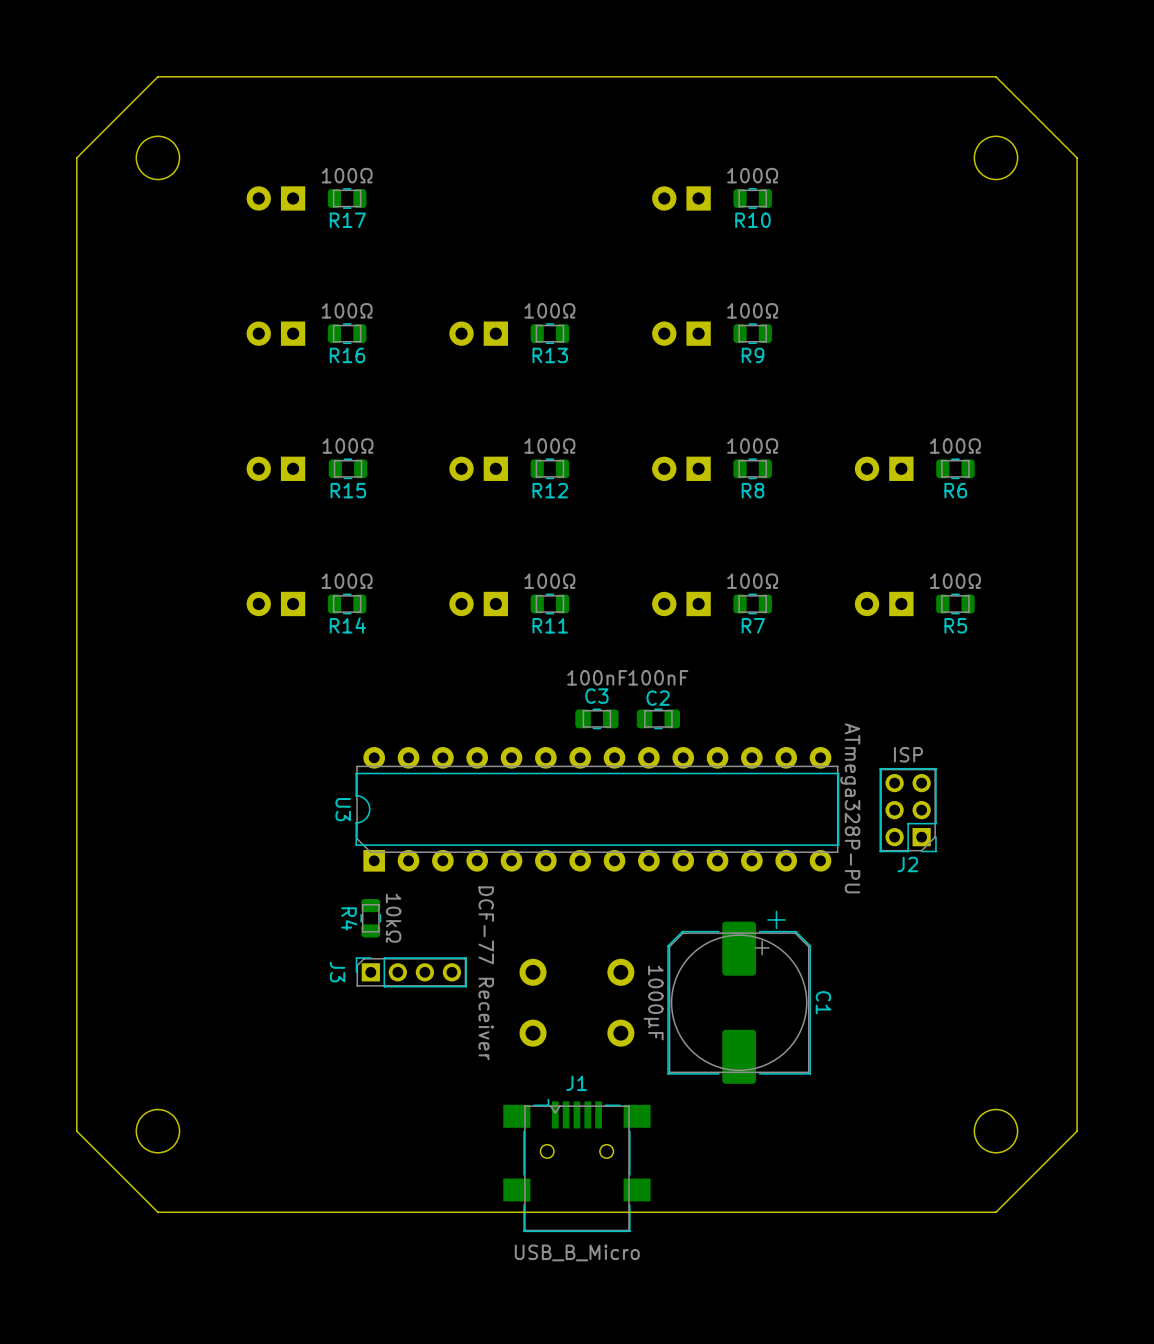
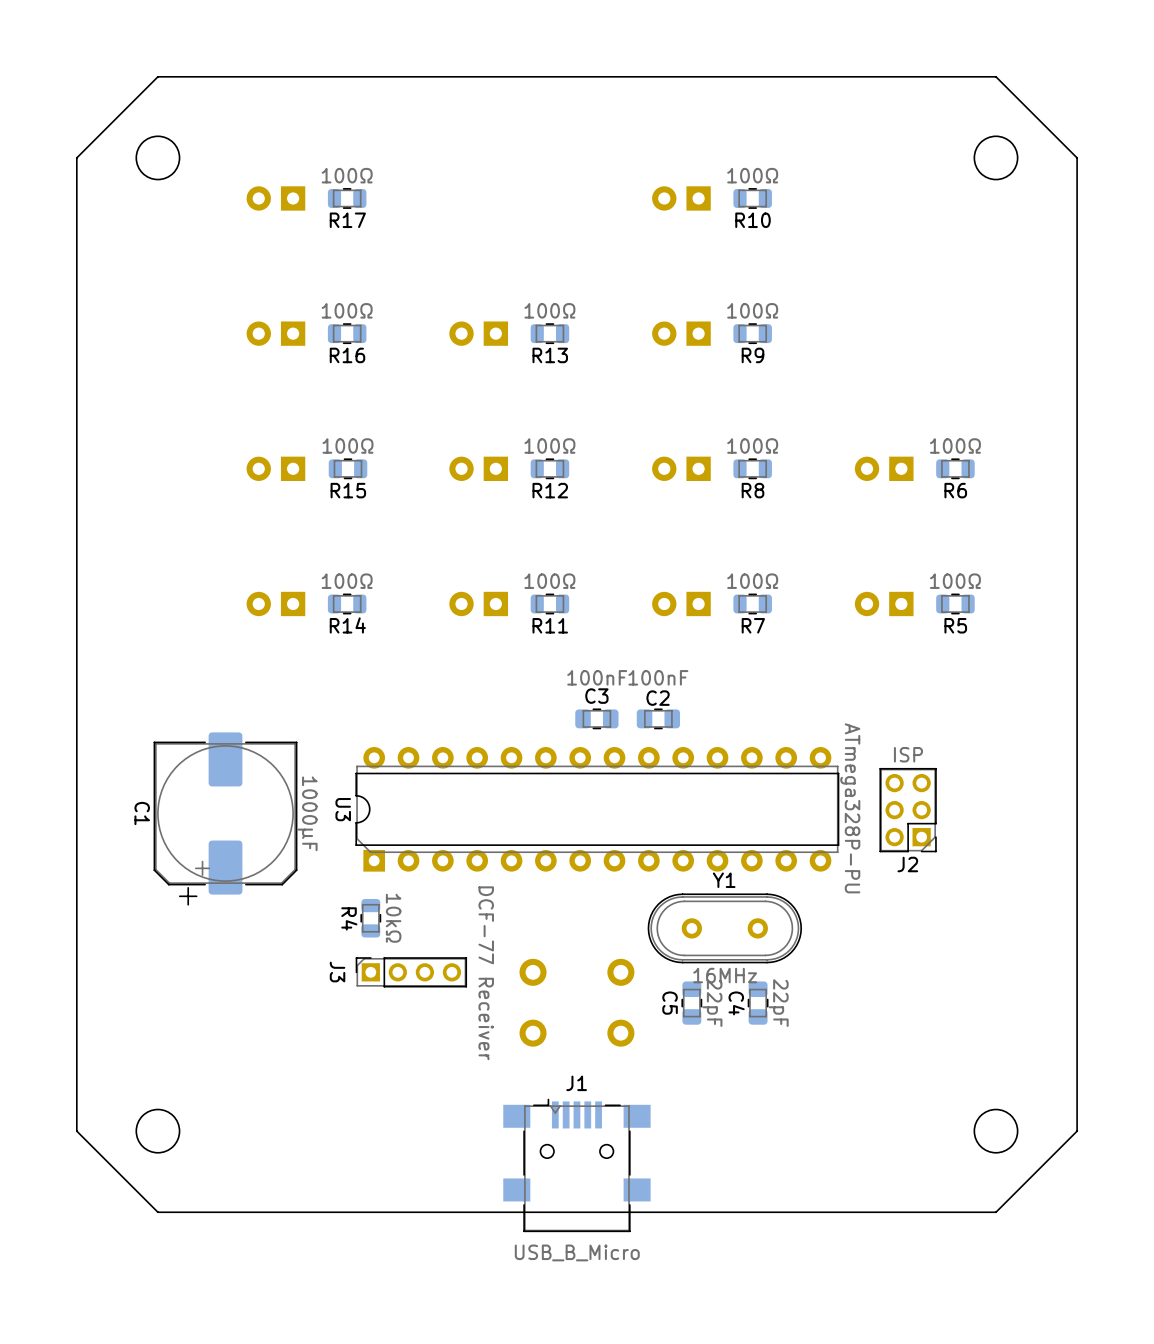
Y1: none -> 16MHz (724, 928)
C1 rotation: 0° (739, 997) -> 180° (225, 818)
C1 position: (739, 997) -> (225, 818)
C5: none -> 22pF (691, 1003)
C4: none -> 22pF (758, 1003)

